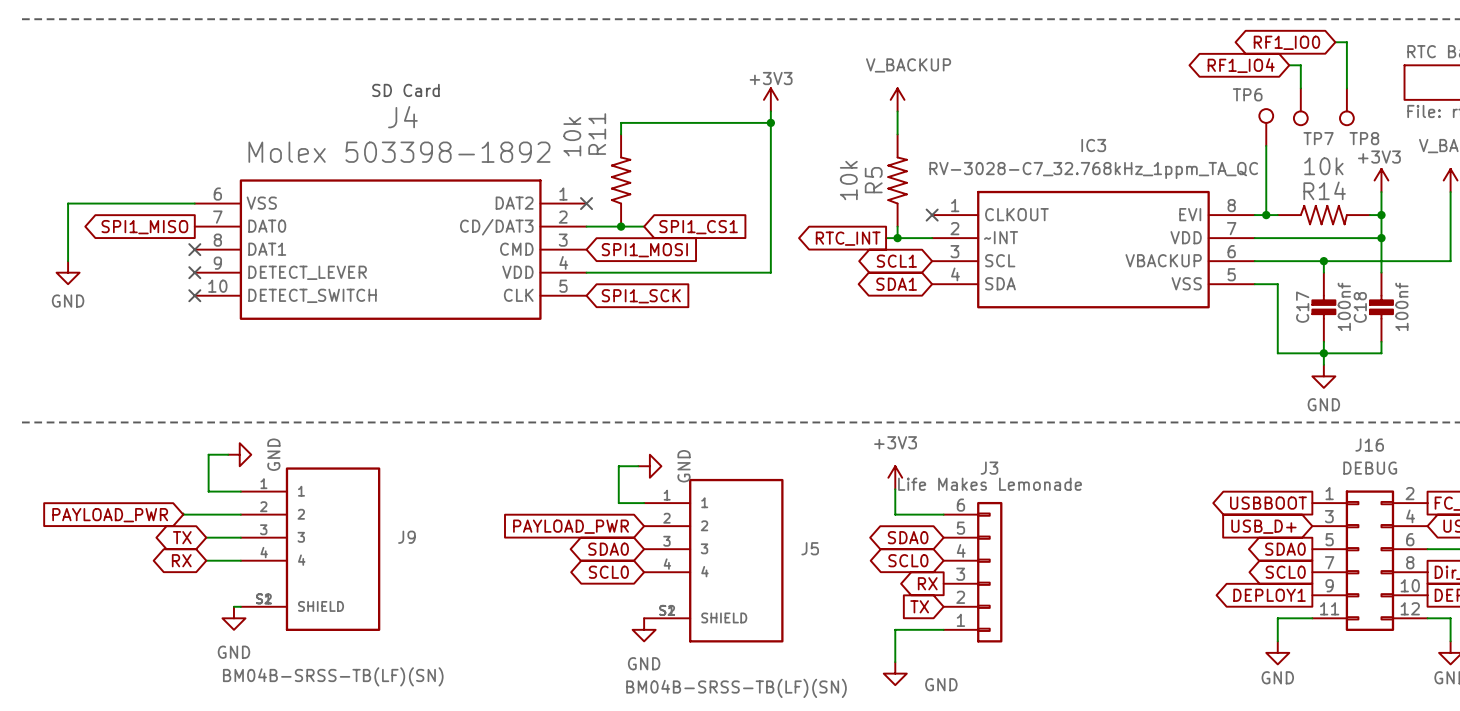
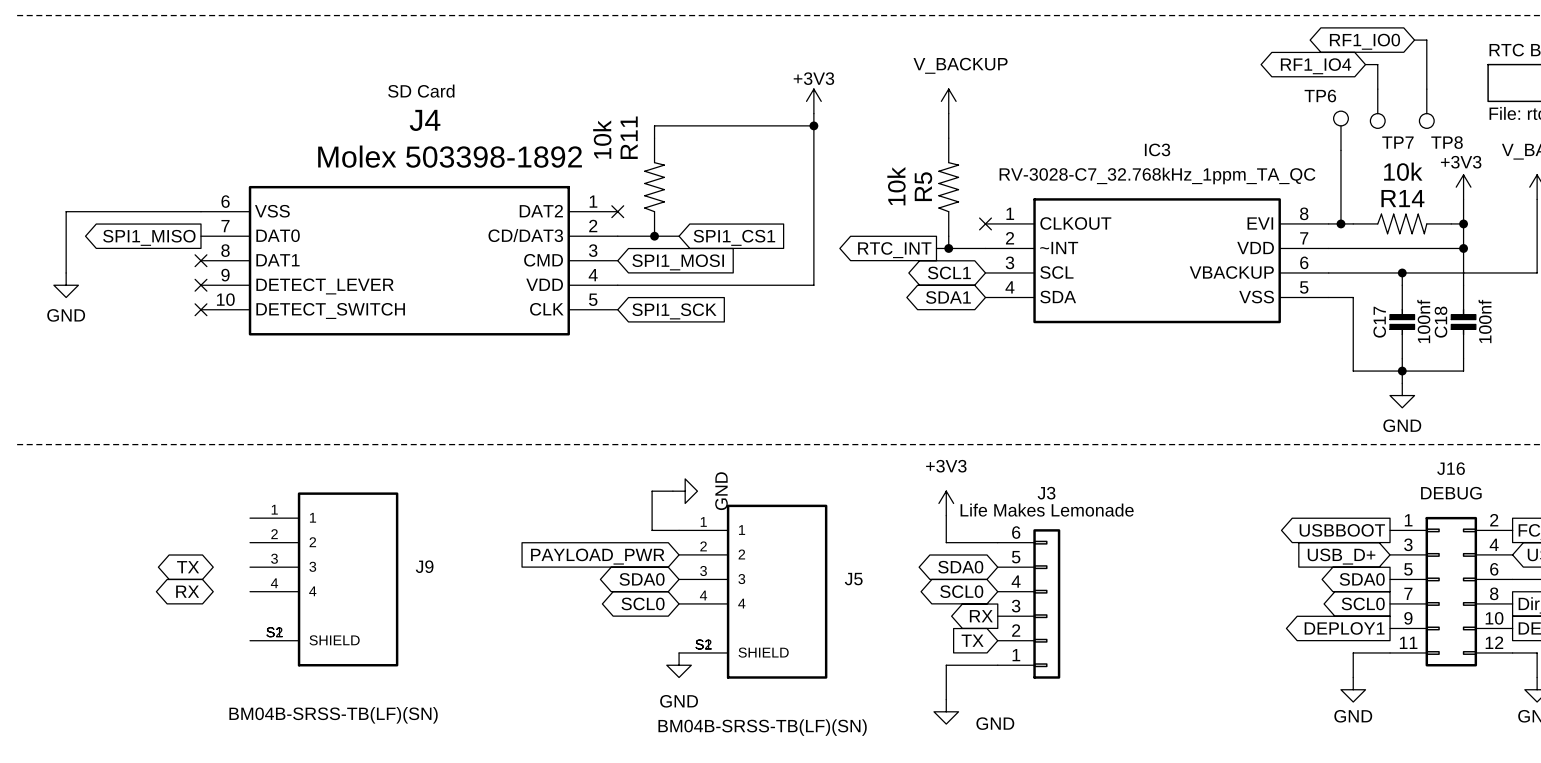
wire: (228, 454) (208, 454) (208, 491) (240, 491) -> none
power symbol: GND (239, 454) -> none
wire: (183, 513) (240, 514) -> none
global label: PAYLOAD_PWR (110, 515) -> none
wire: (206, 537) (240, 537) -> none
wire: (206, 560) (240, 560) -> none
wire: (233, 606) (240, 606) -> none
power symbol: GND (233, 618) -> none

